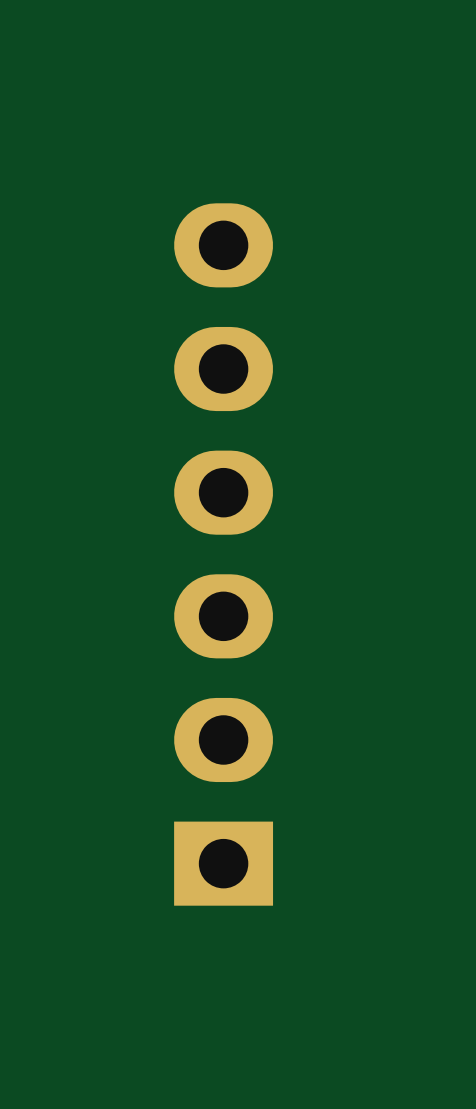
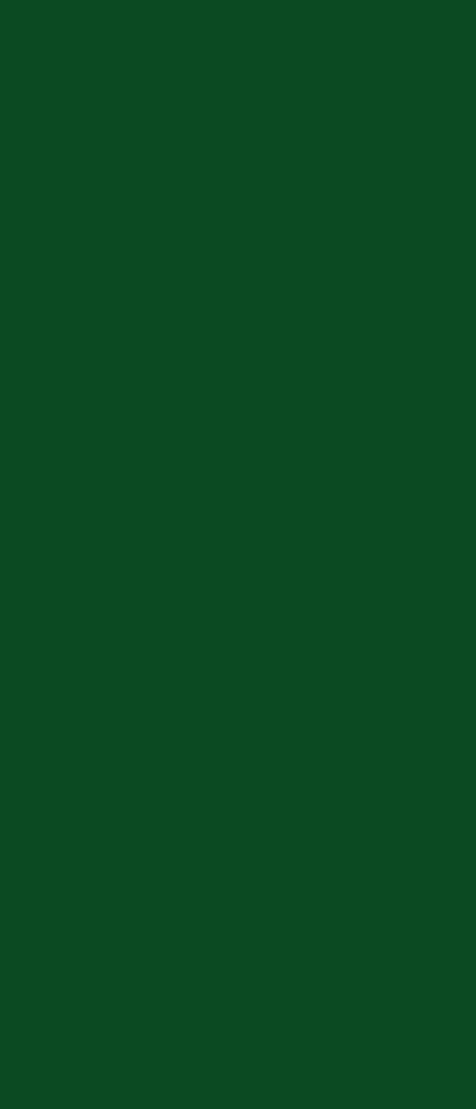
part: (223, 554) -> none

